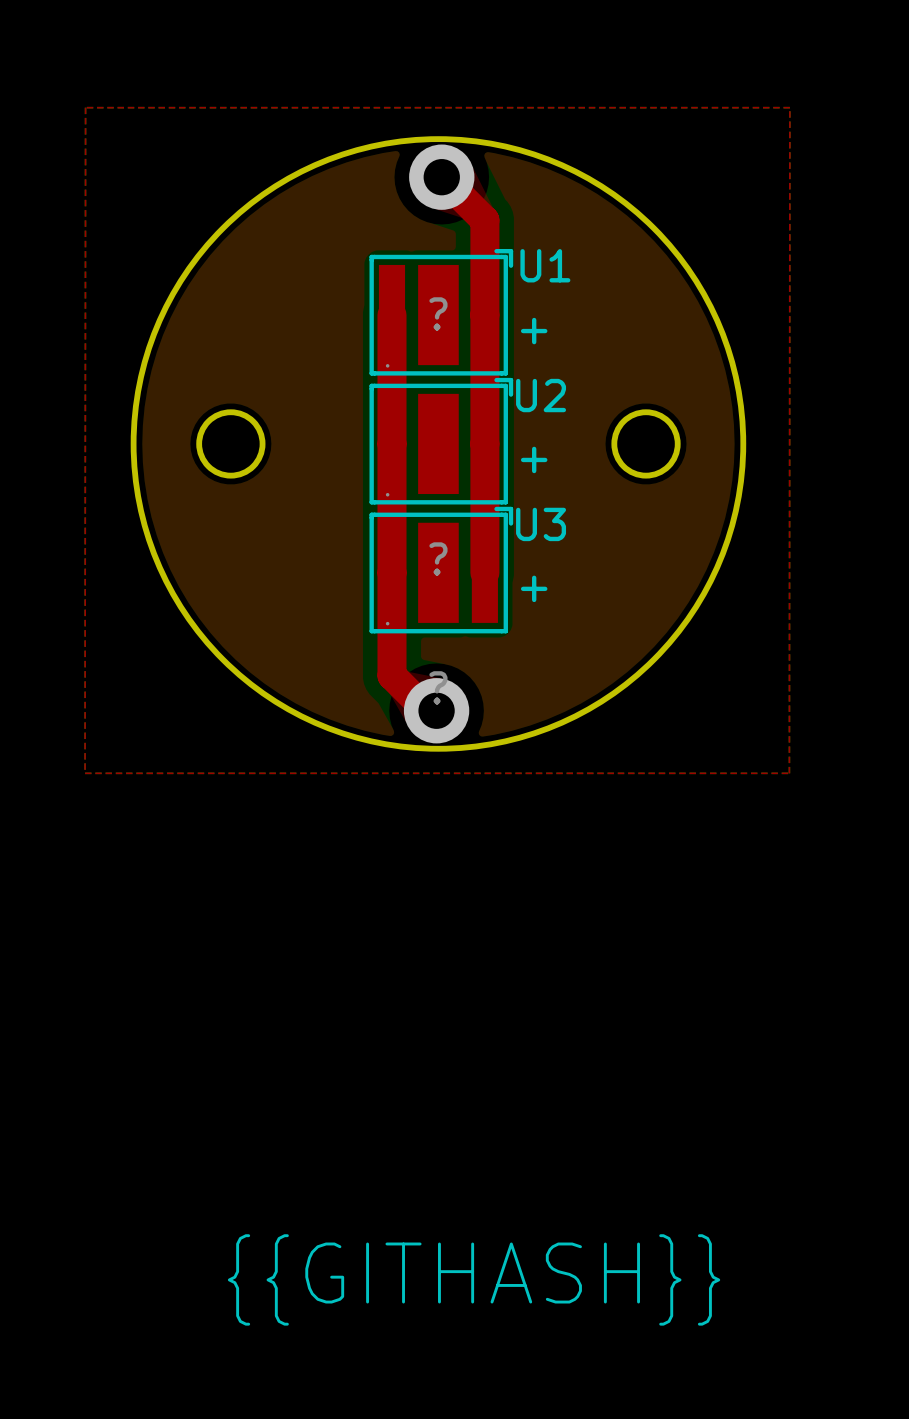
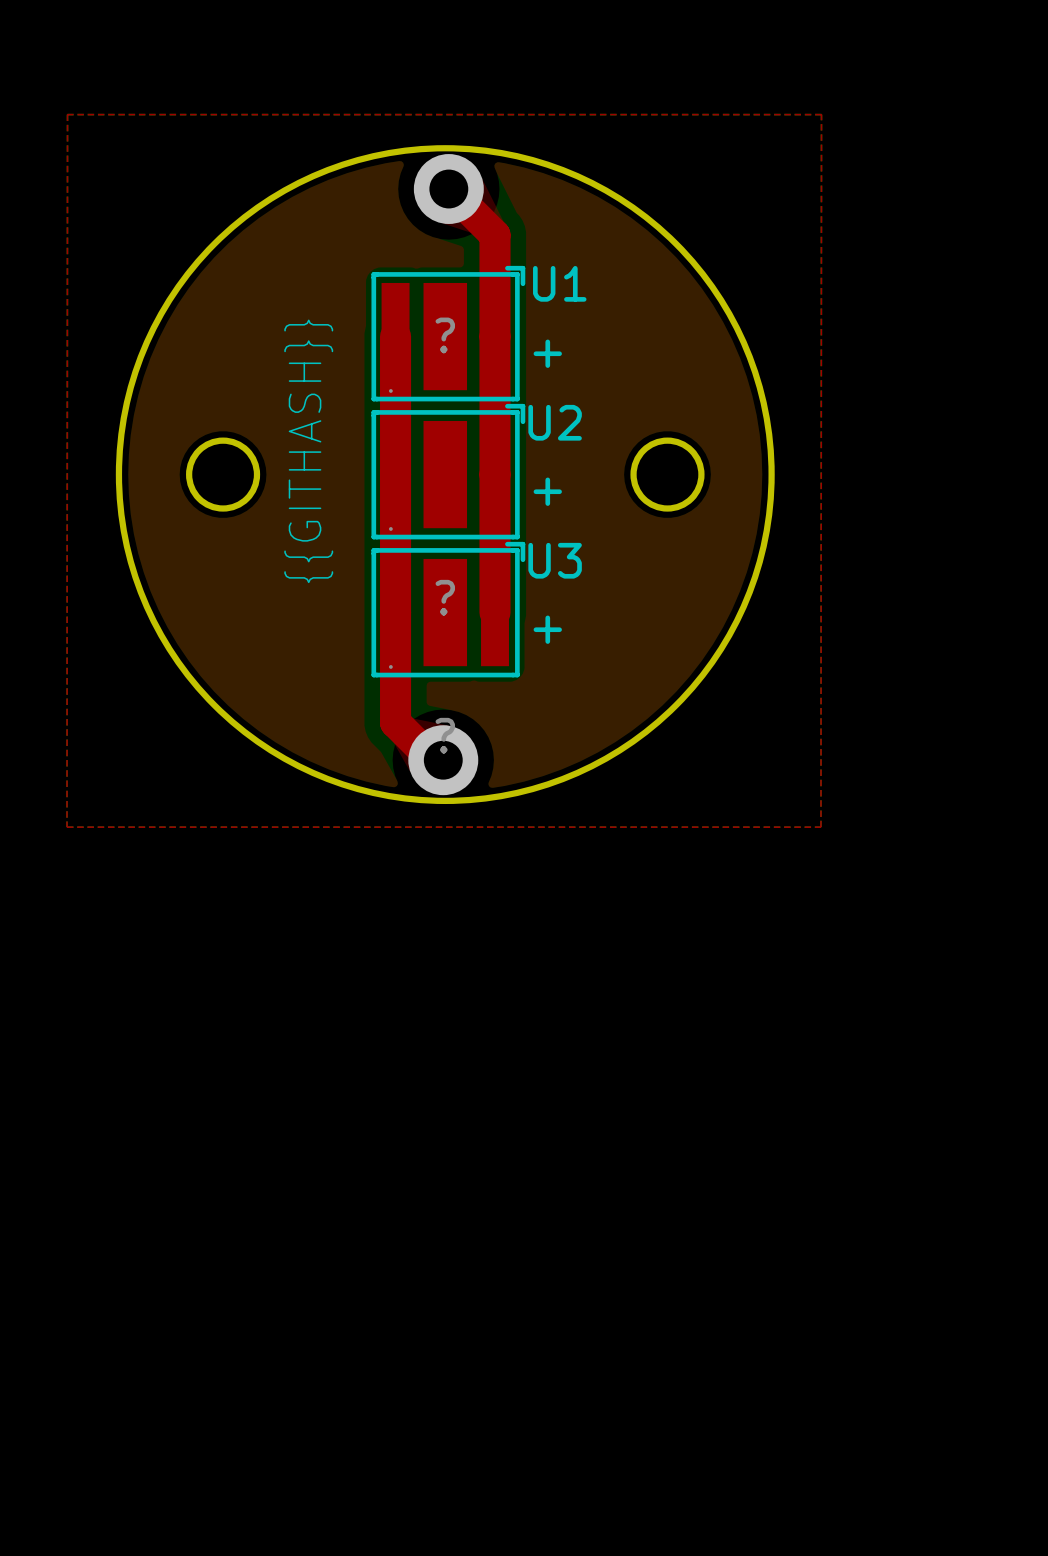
text: none -> {{GITHASH}} (308, 451)
text: {{GITHASH}} (474, 1279) -> none

